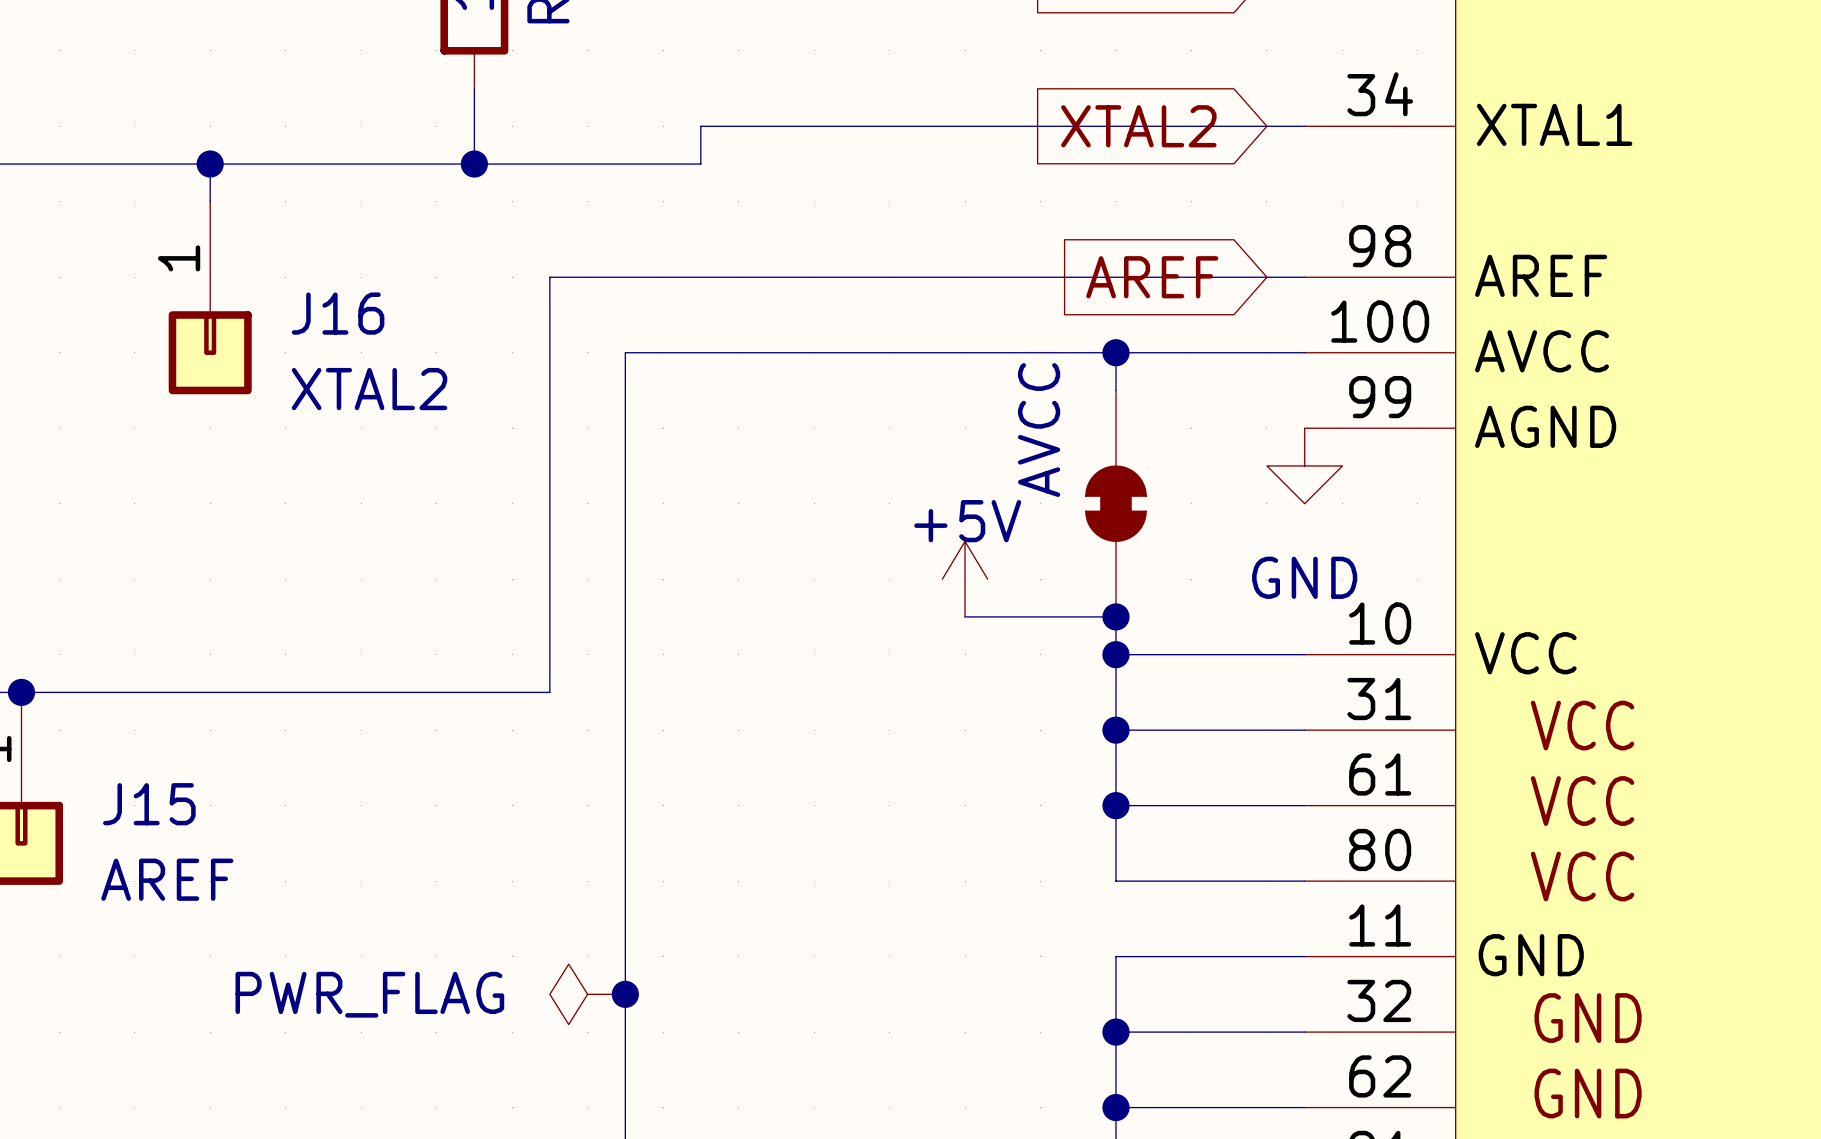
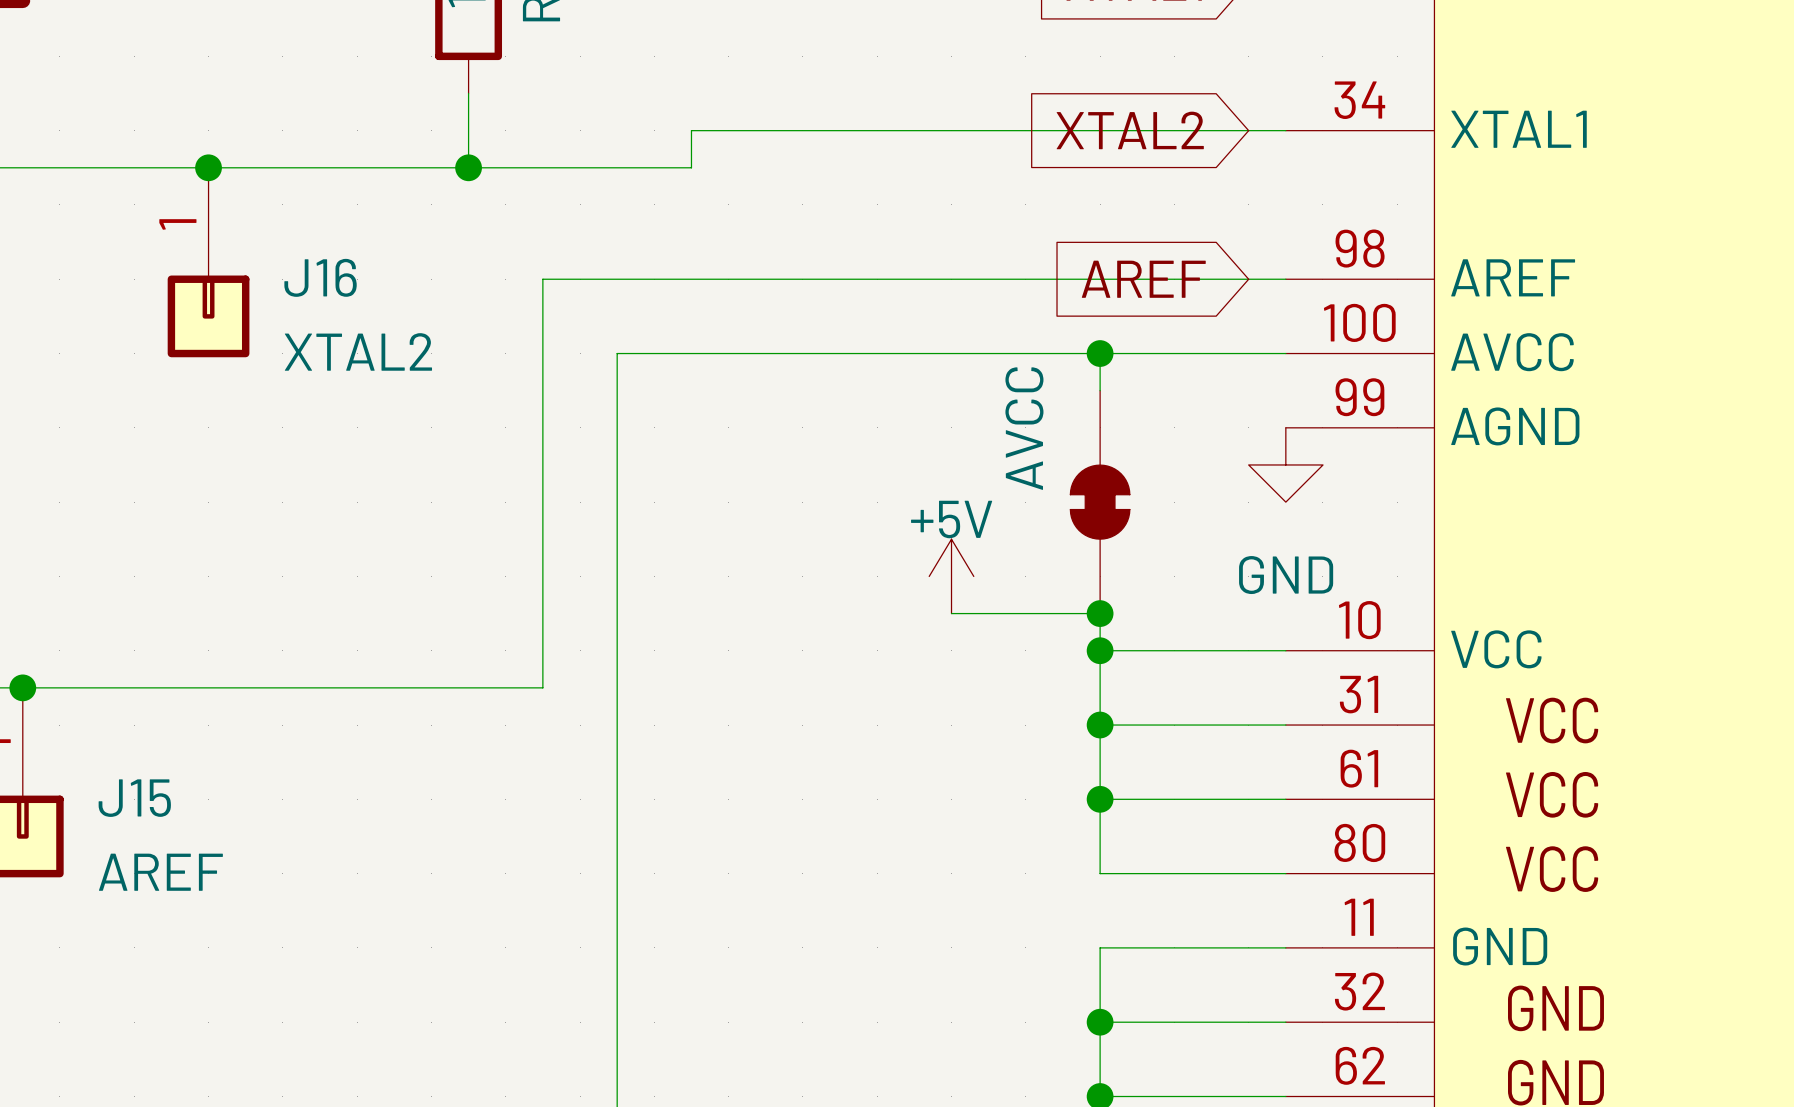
J16 position: (210, 298) -> (208, 262)
power symbol: PWR_FLAG (587, 994) -> none
junction: (625, 994) -> none

